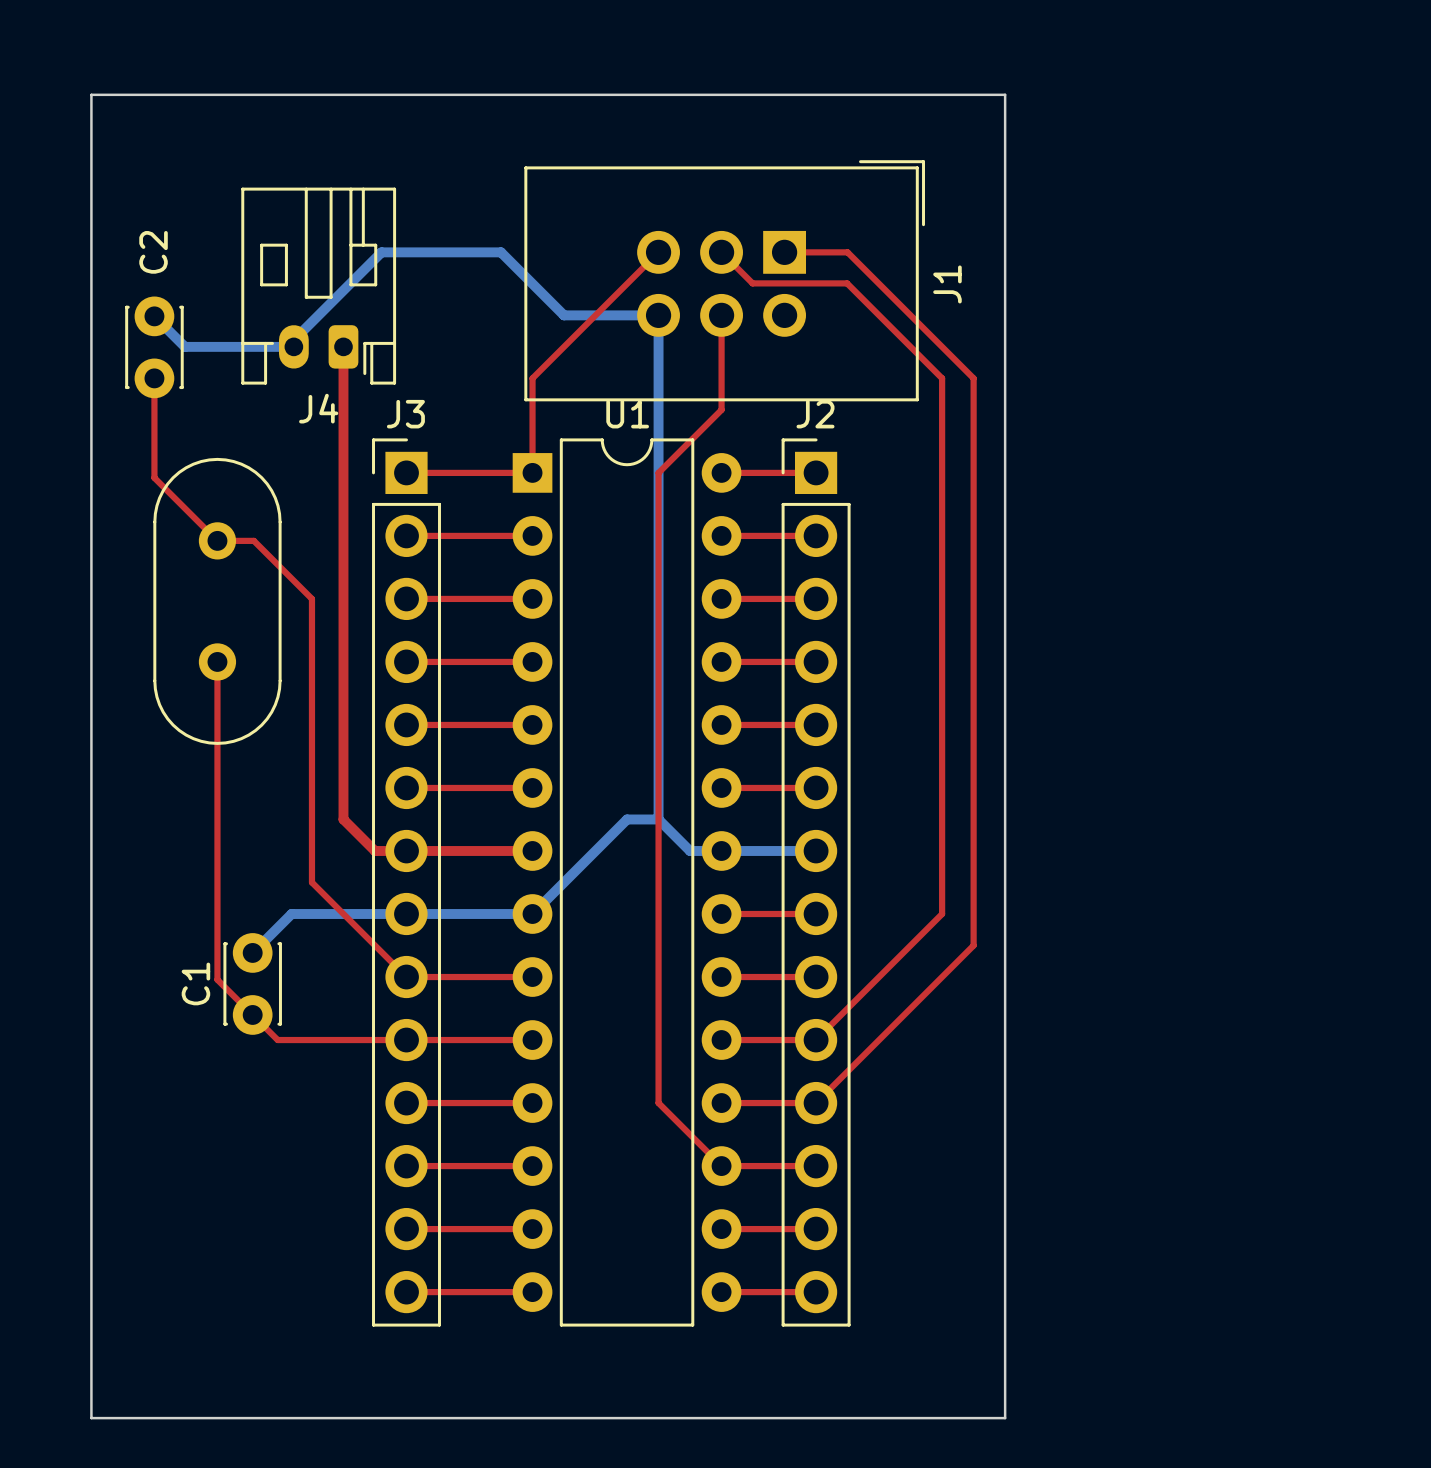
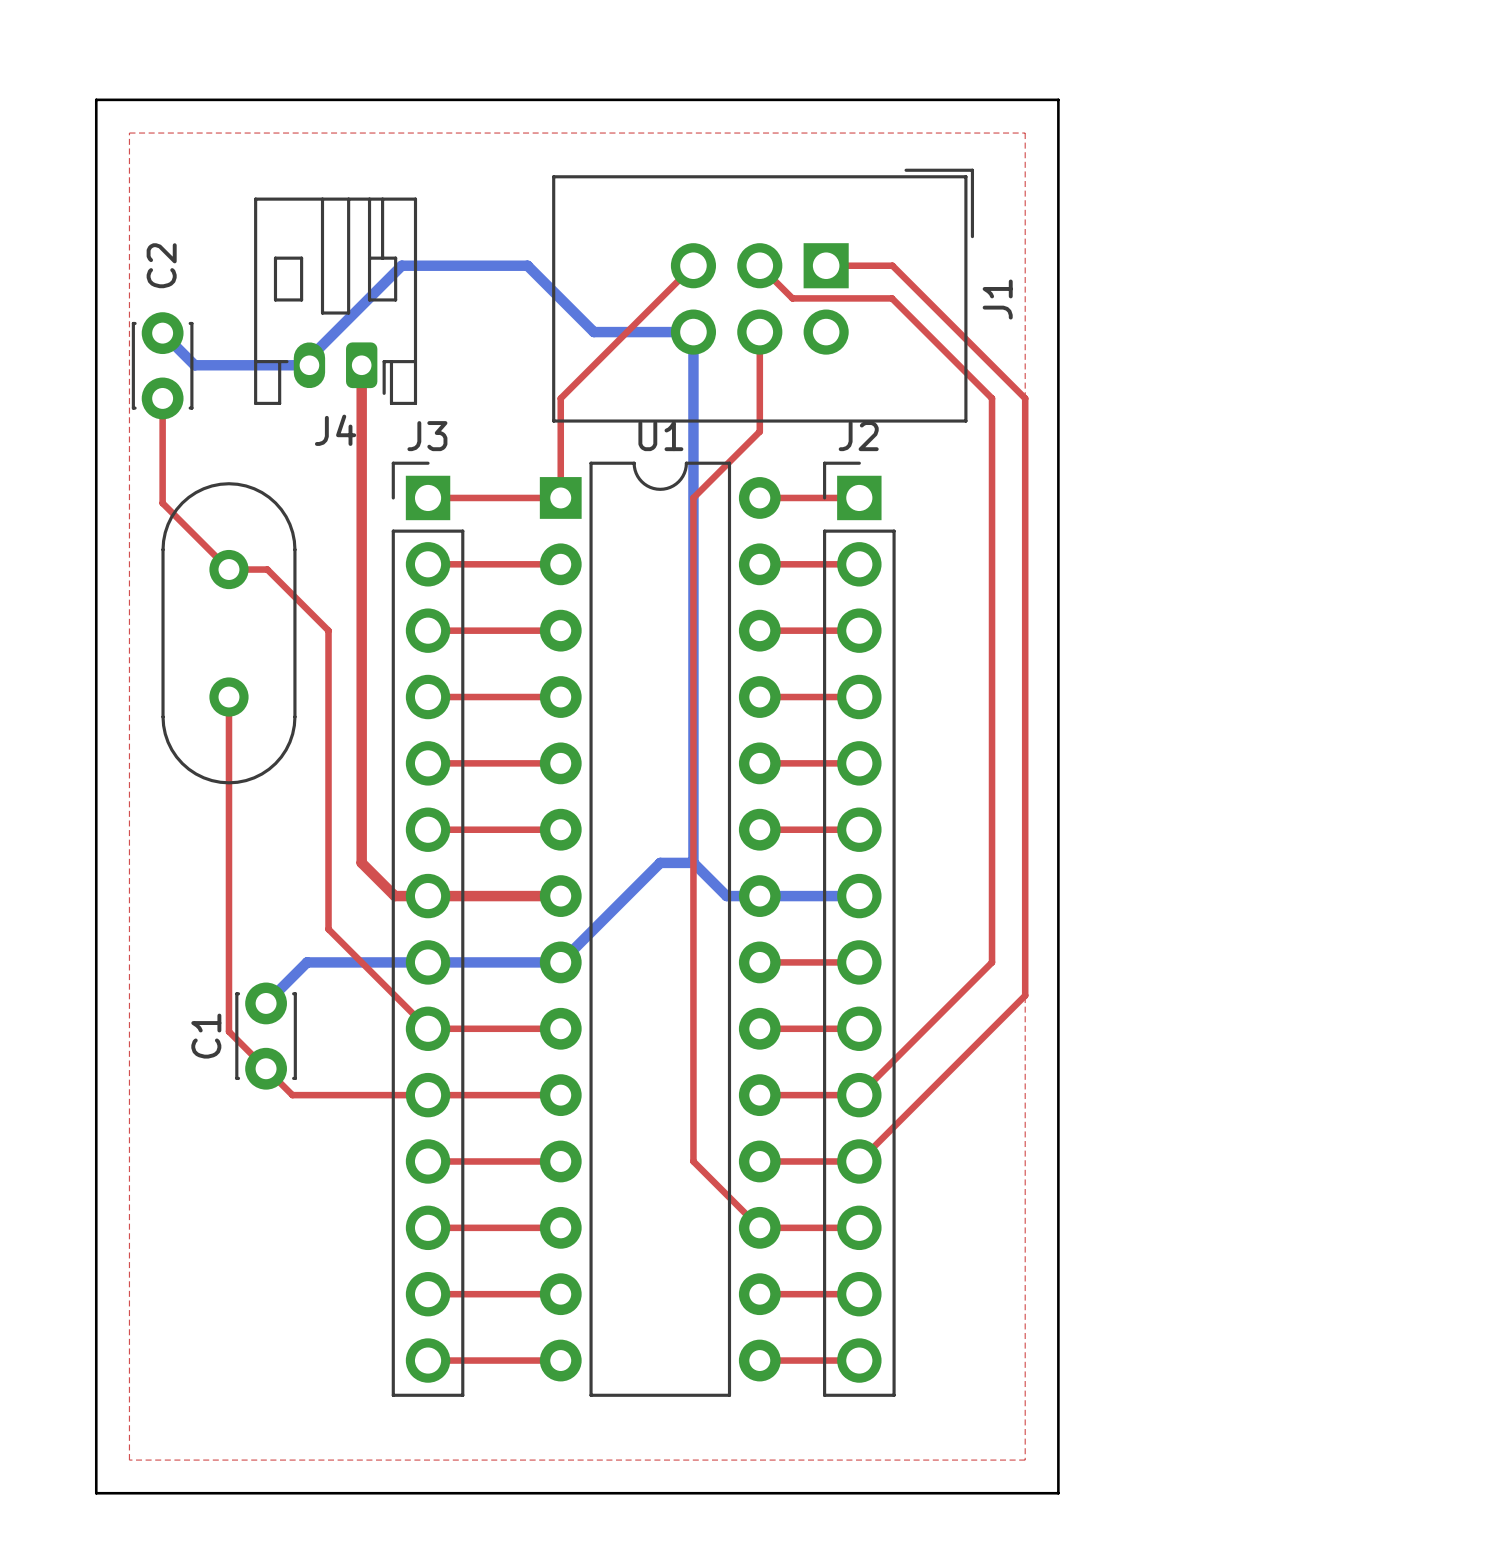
top zone outline: none -> (129, 133) (1025, 133) (1025, 1460) (129, 1460) (129, 133)

